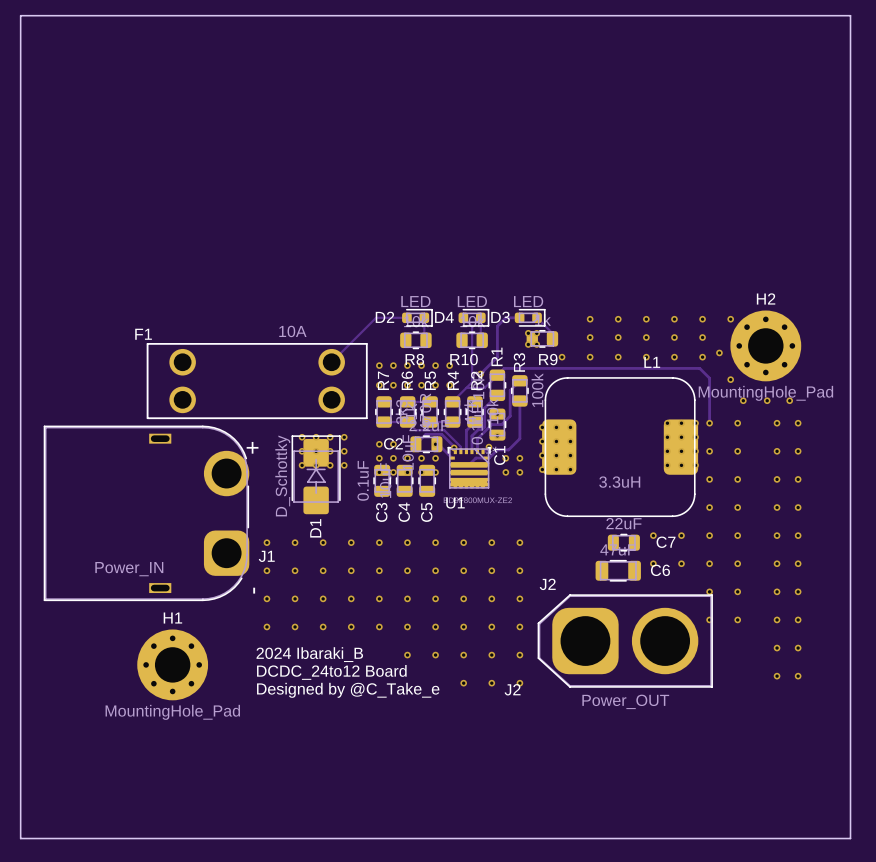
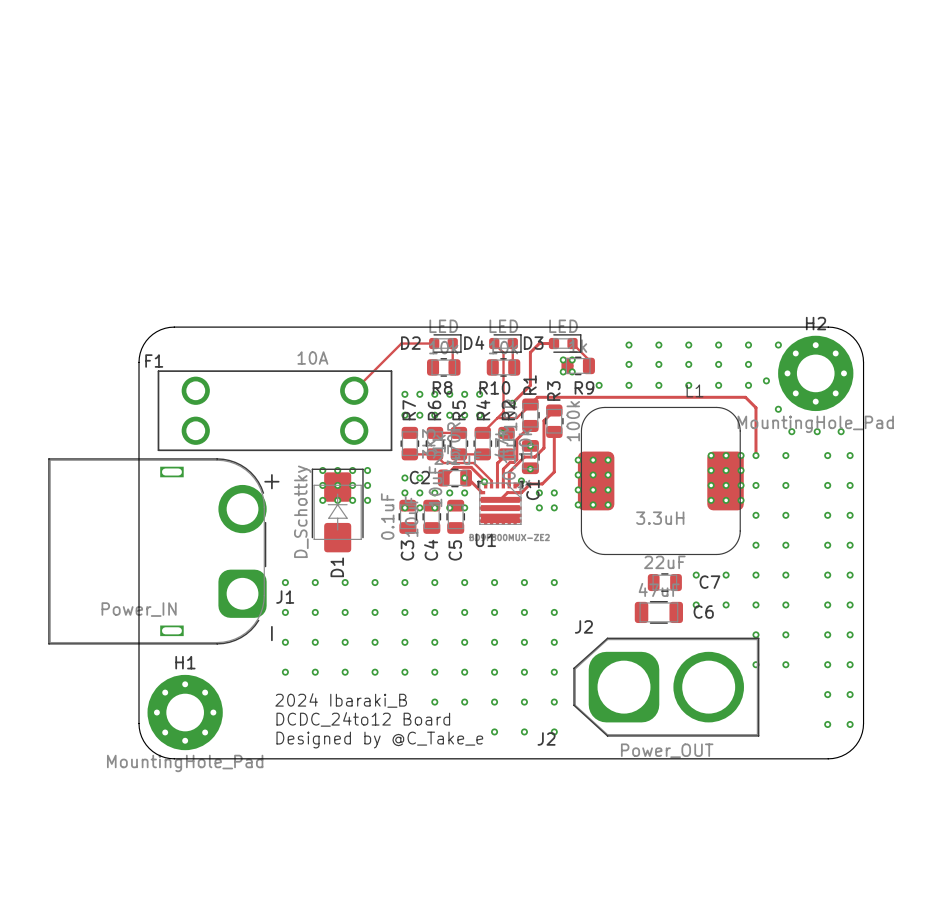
board edge: (20, 15) (850, 15) (850, 838) (20, 838) (20, 15) -> none
board edge: none -> (174, 327) (828, 327) (845, 331) (858, 344) (863, 362) (863, 723) (858, 741) (845, 754) (828, 758) (174, 758) (156, 754) (143, 741) (139, 723) (139, 362) (141, 348) (149, 337) (160, 329) (174, 327)

